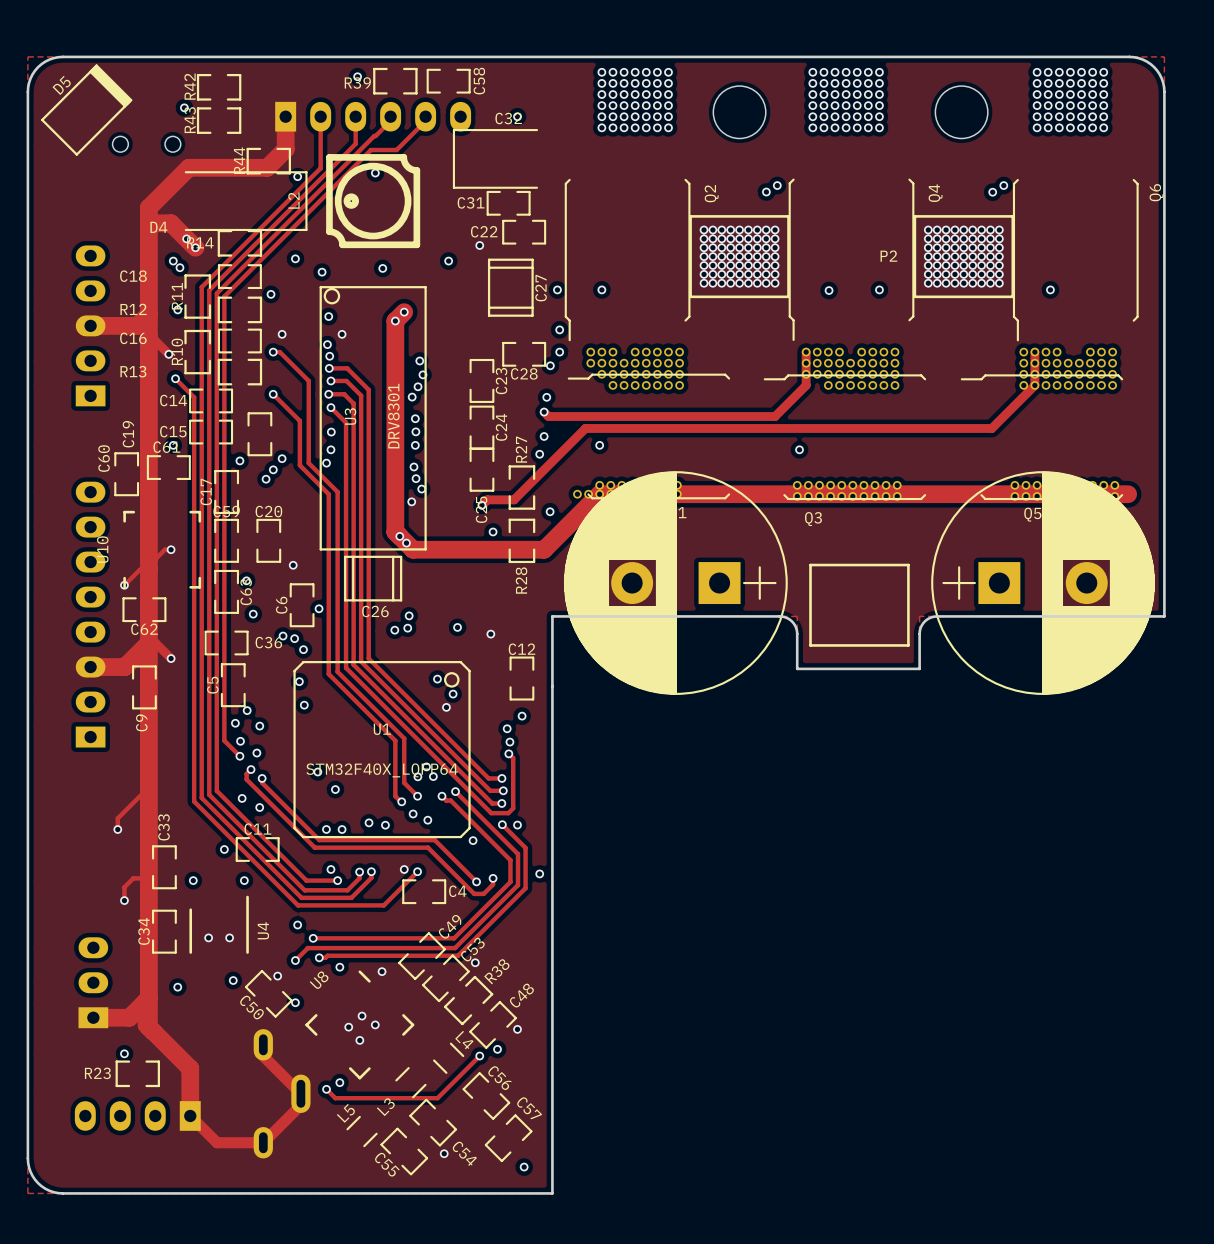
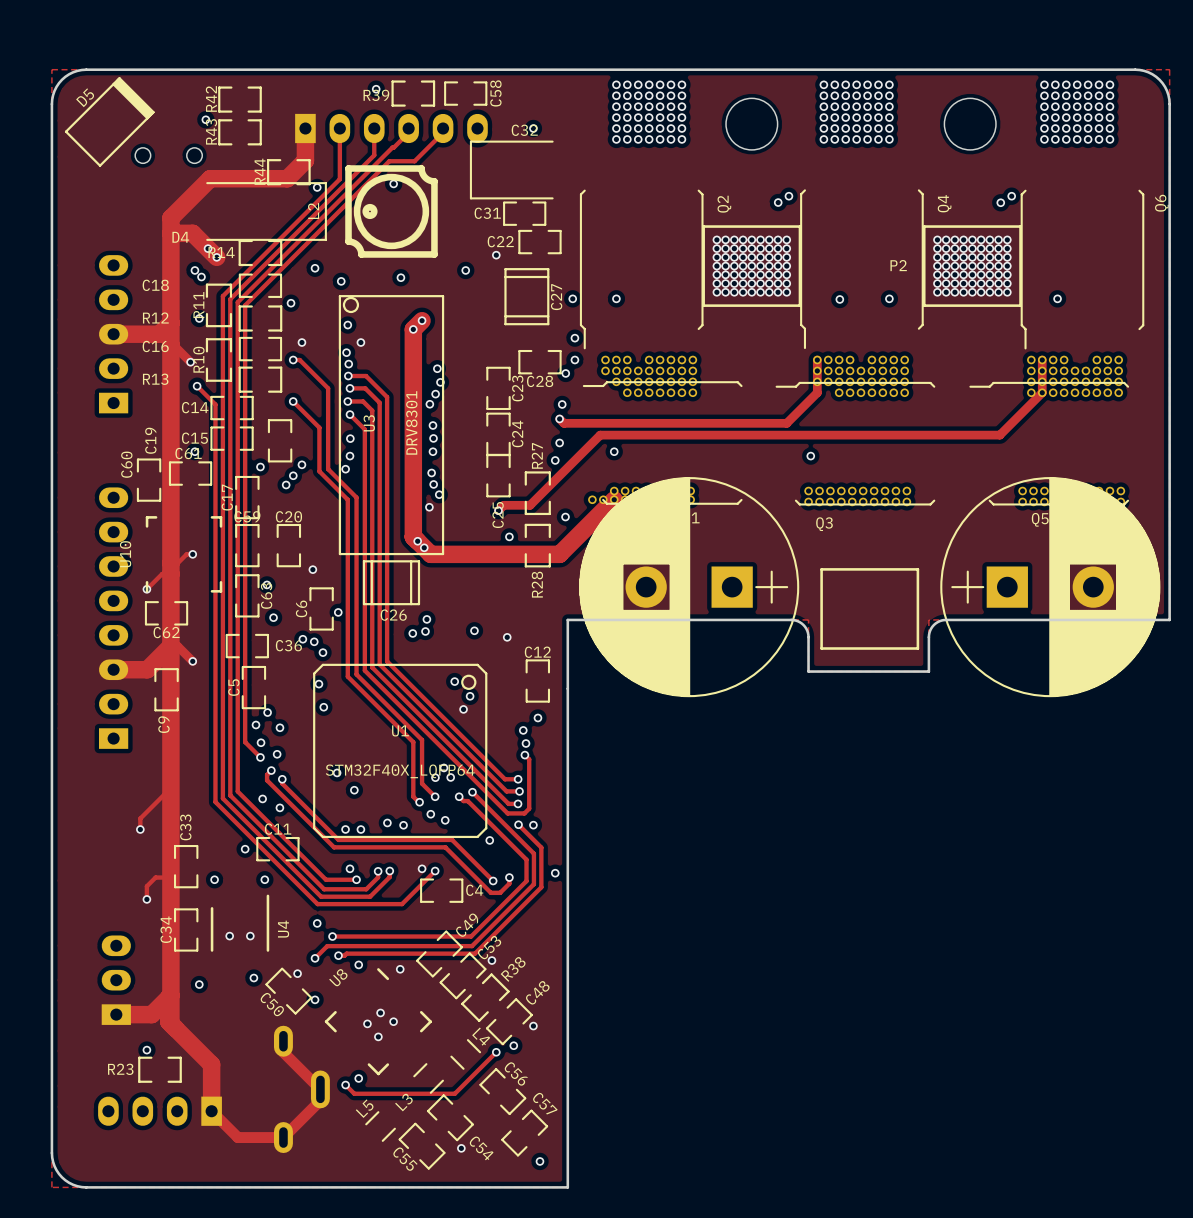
track: (599, 494) (1128, 494) -> none

